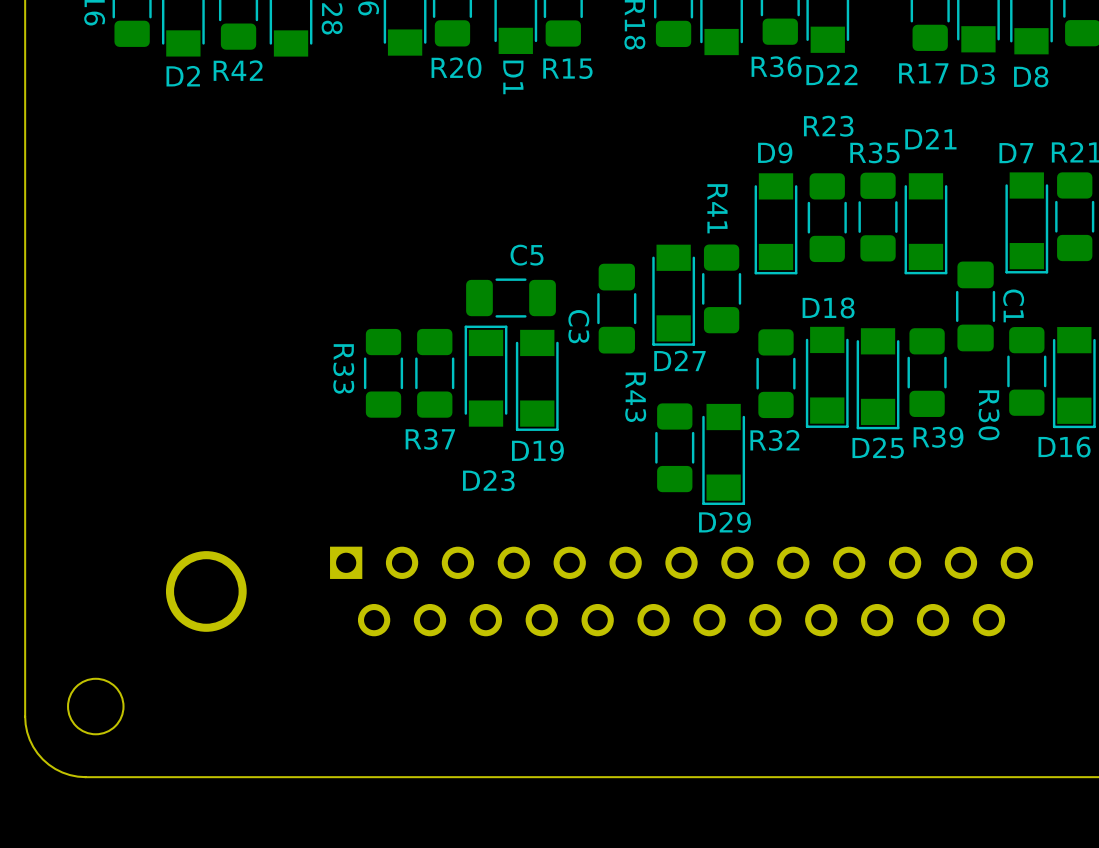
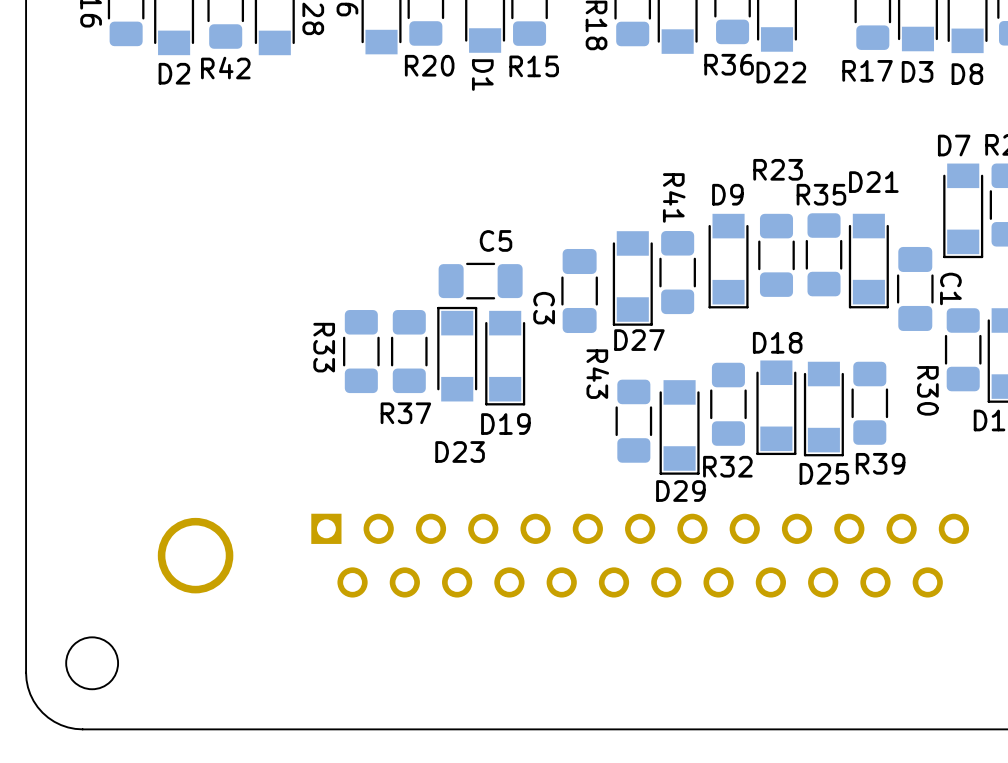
R23 position: (827, 217) -> (776, 255)
R35 position: (878, 217) -> (824, 254)
D9 position: (775, 223) -> (728, 261)
D21 position: (925, 223) -> (868, 261)
R39 position: (927, 372) -> (869, 403)
R32 position: (775, 373) -> (728, 404)
D18 position: (827, 377) -> (776, 407)
D25 position: (878, 378) -> (823, 409)

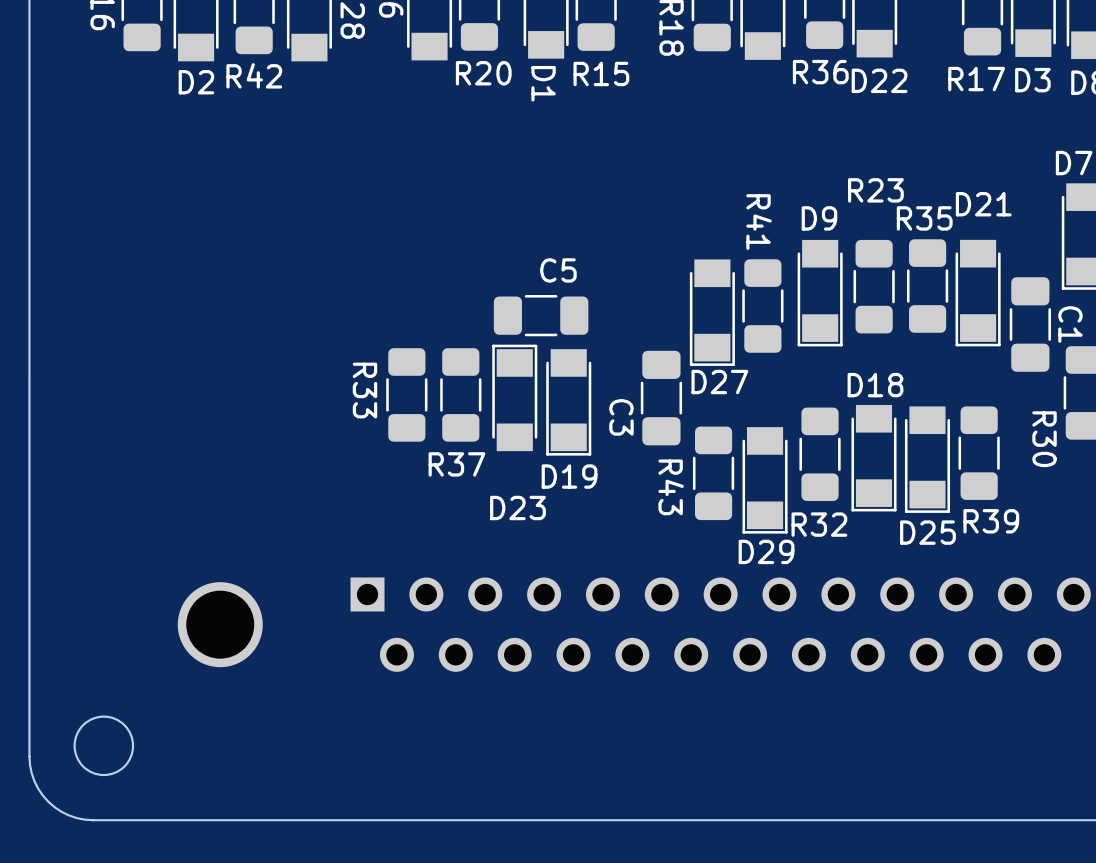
C3 position: (579, 291) -> (661, 398)
R43 name position: R43 (597, 374) -> R43 (671, 487)

